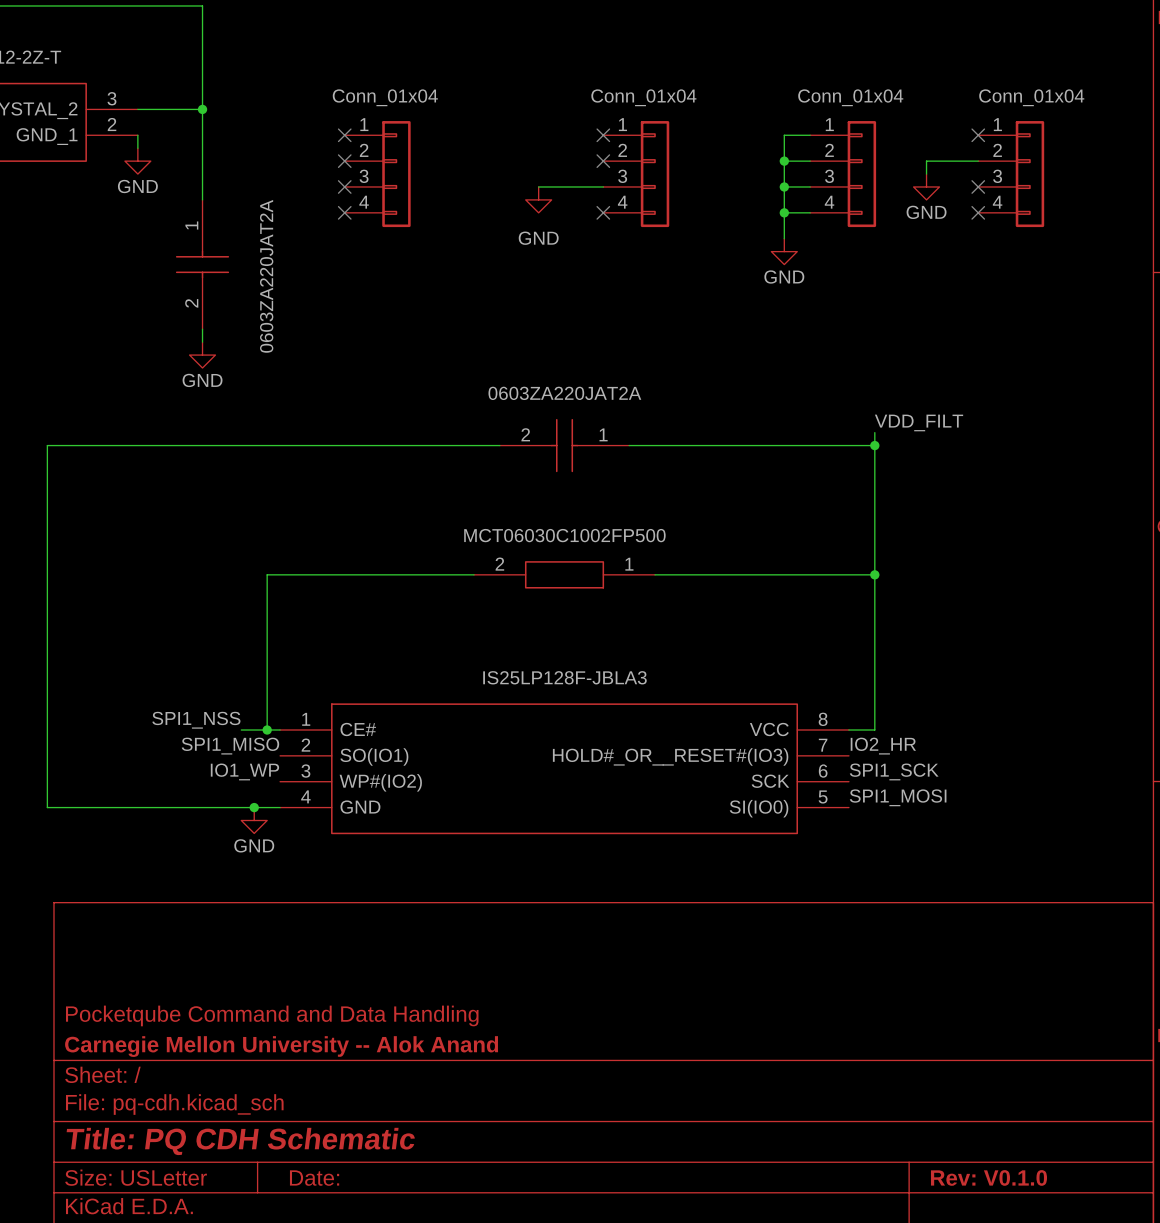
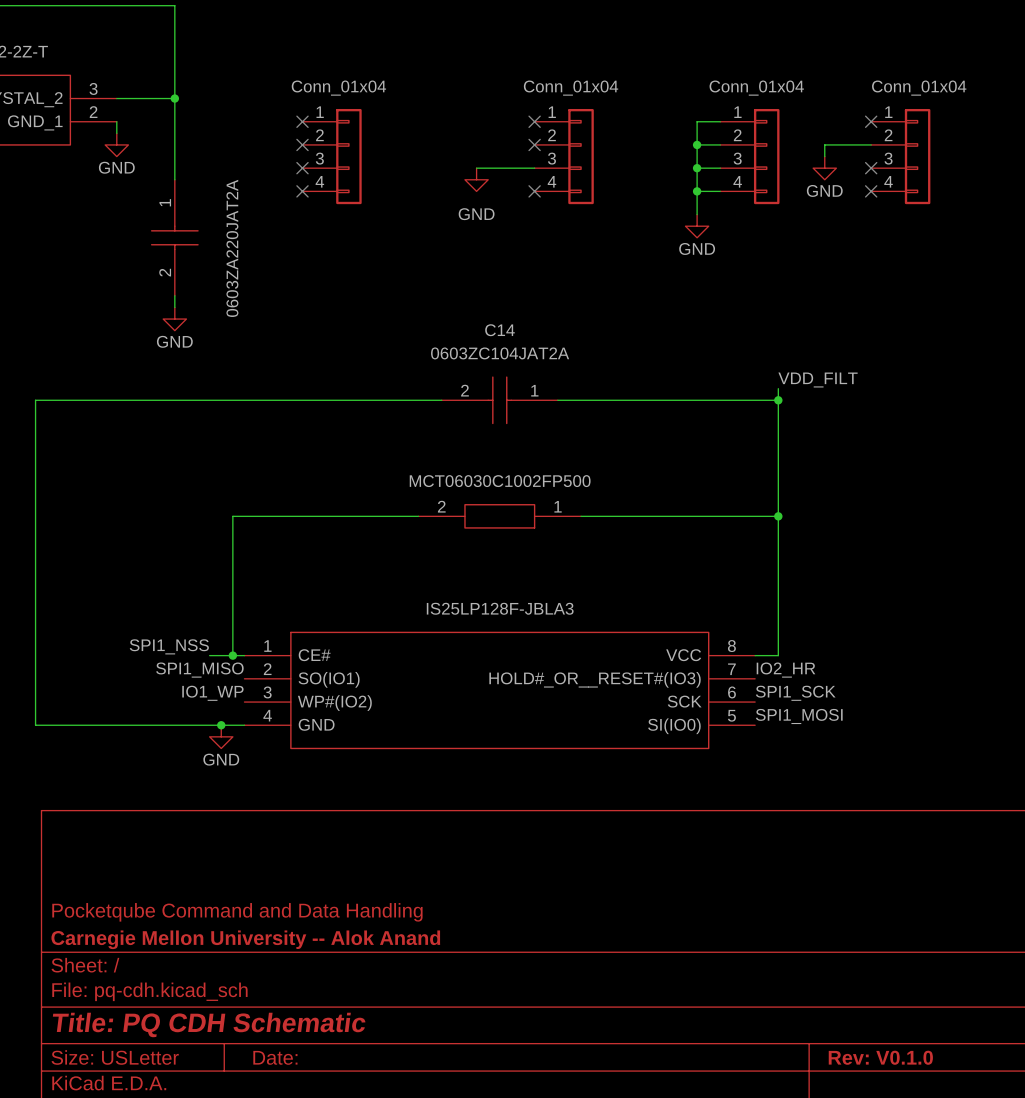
C14 name: none -> C14 (499, 330)
C14 value: 0603ZA220JAT2A (564, 393) -> 0603ZC104JAT2A (500, 353)

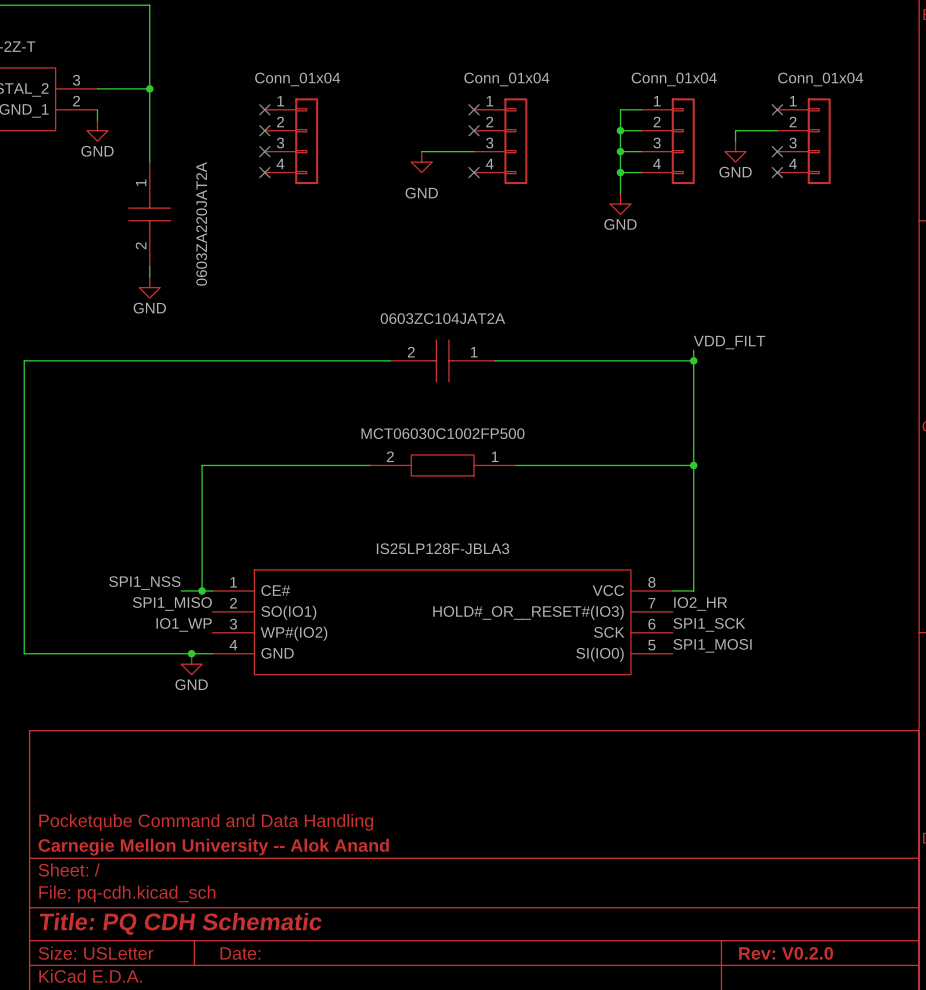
C14 name: C14 (499, 330) -> none
title block: Rev: V0.1.0 (880, 1057) -> Rev: V0.2.0 (786, 953)

